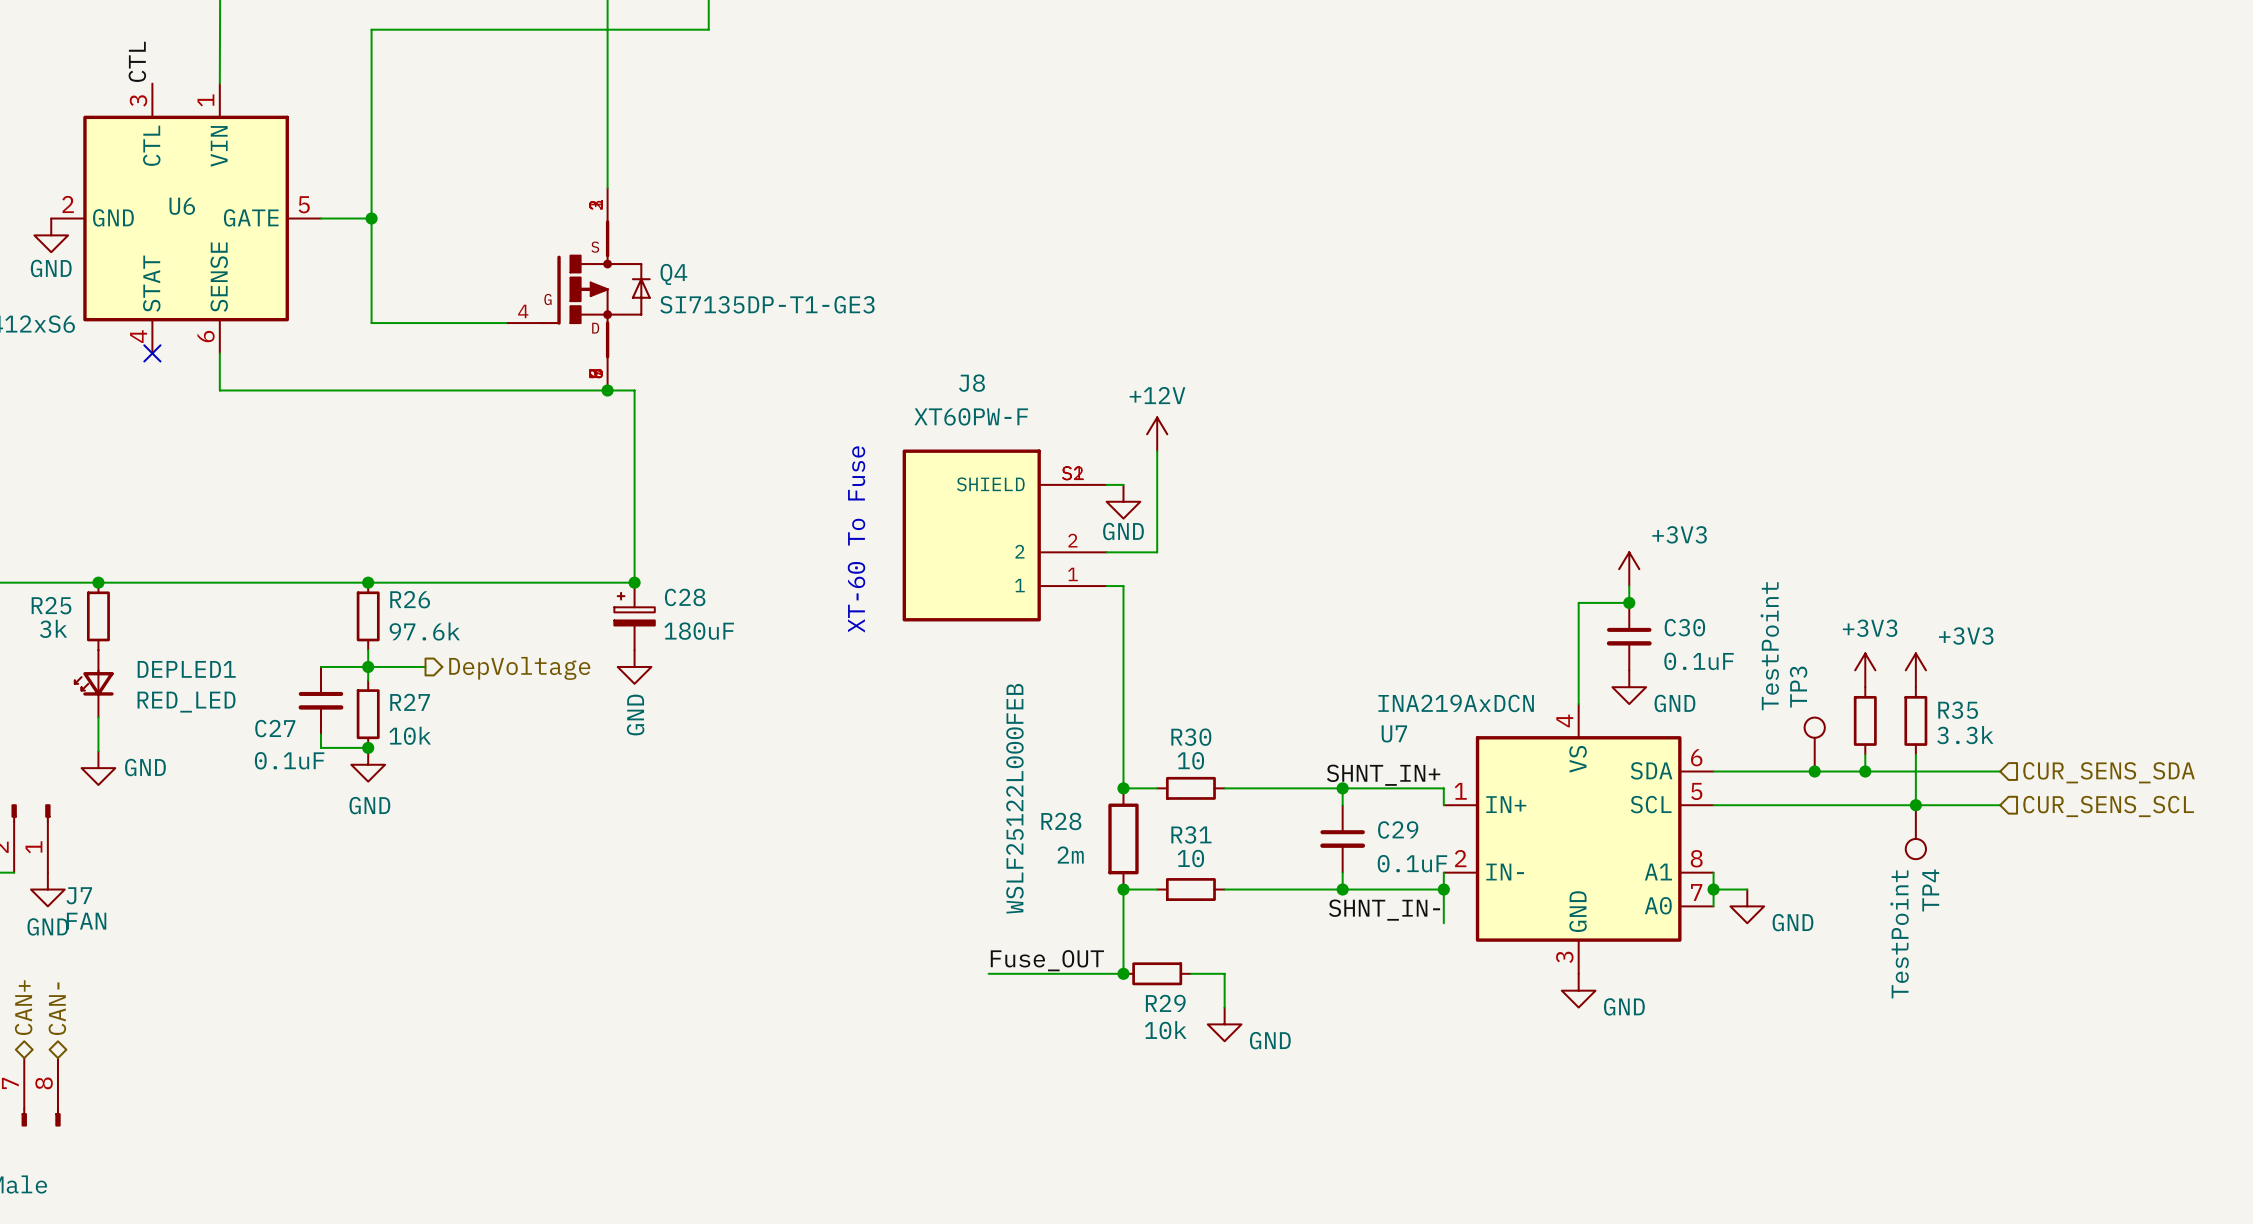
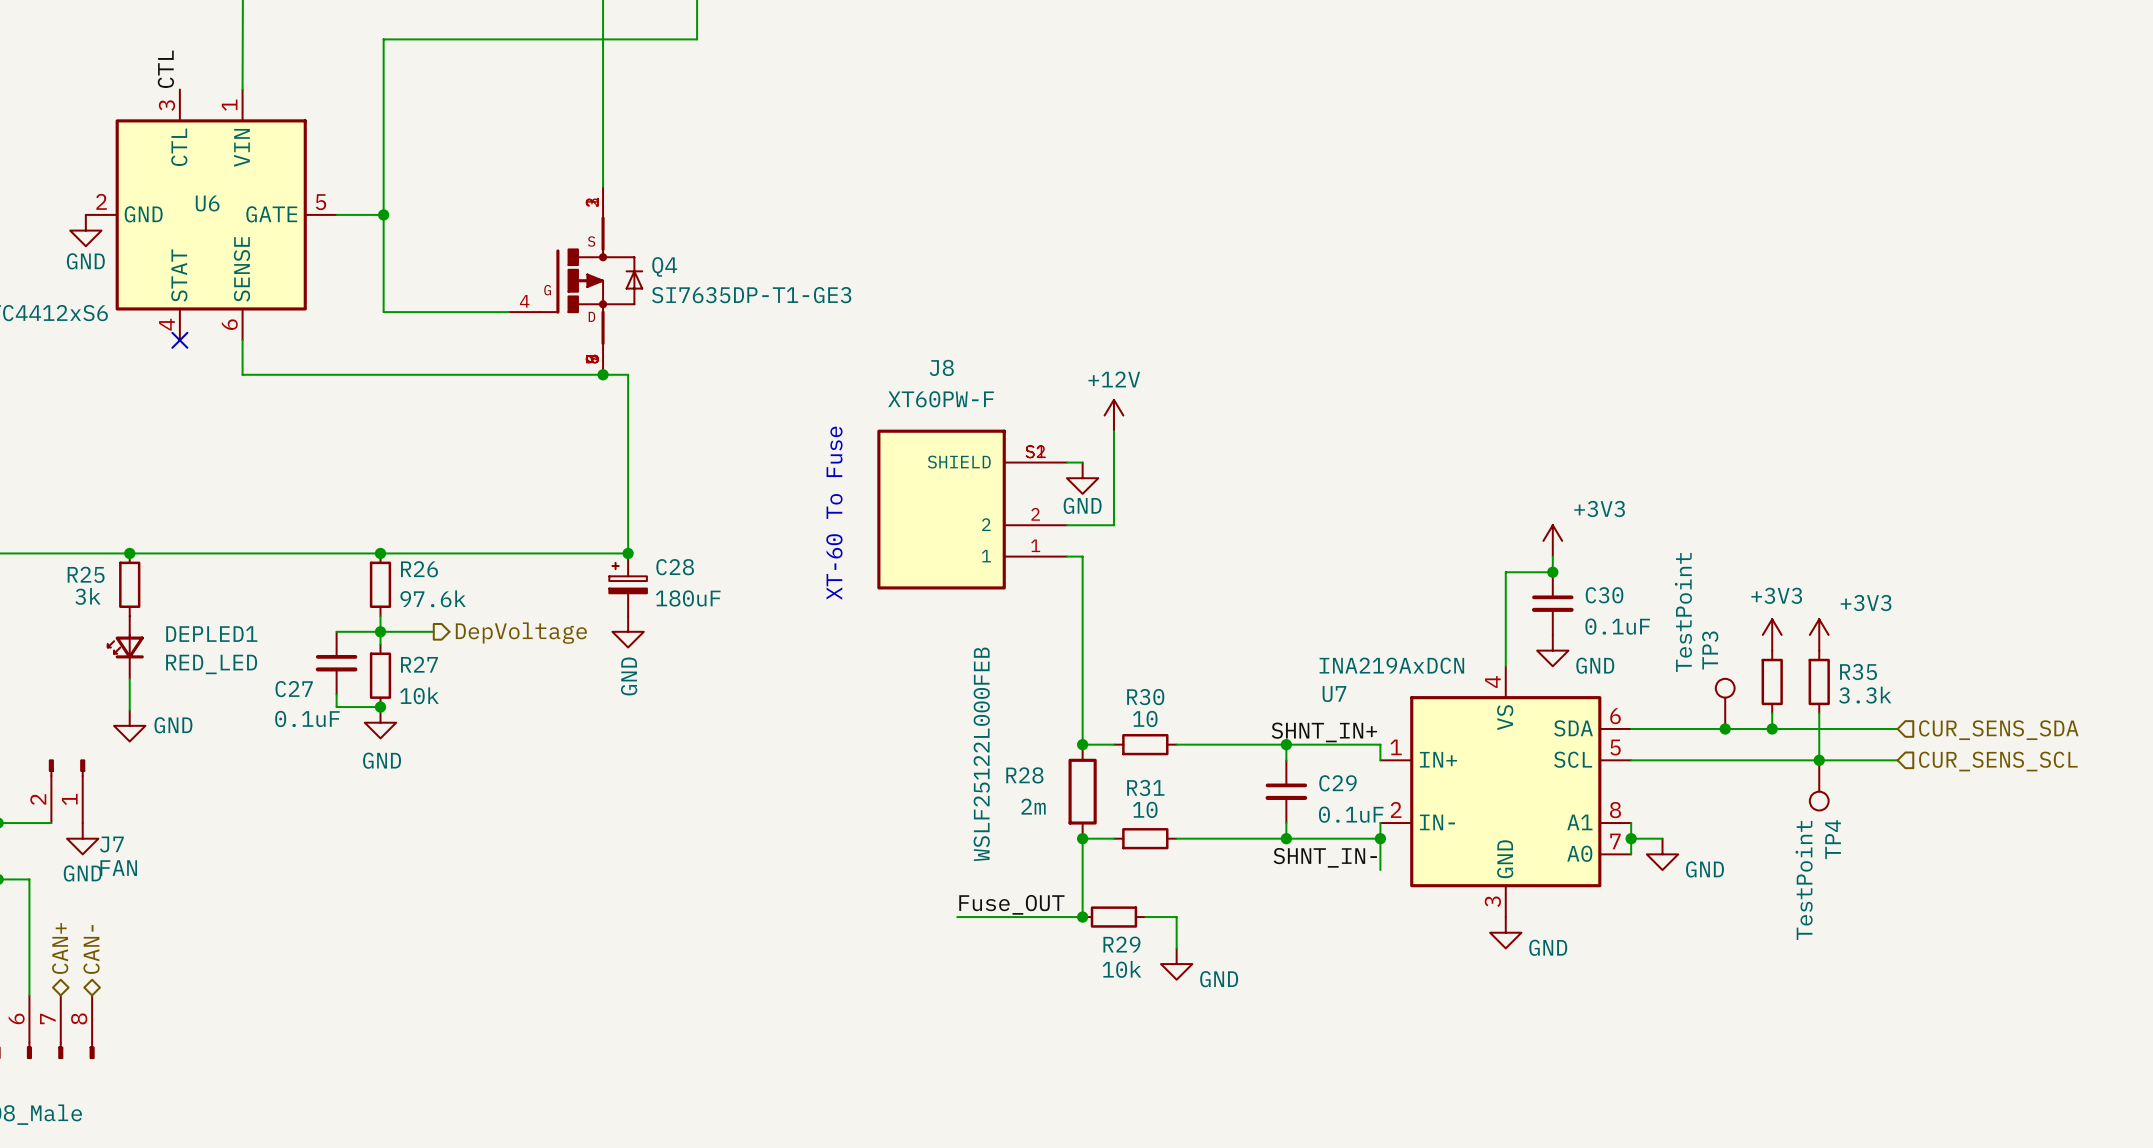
Q4 value: SI7135DP-T1-GE3 (767, 304) -> SI7635DP-T1-GE3 (751, 295)

